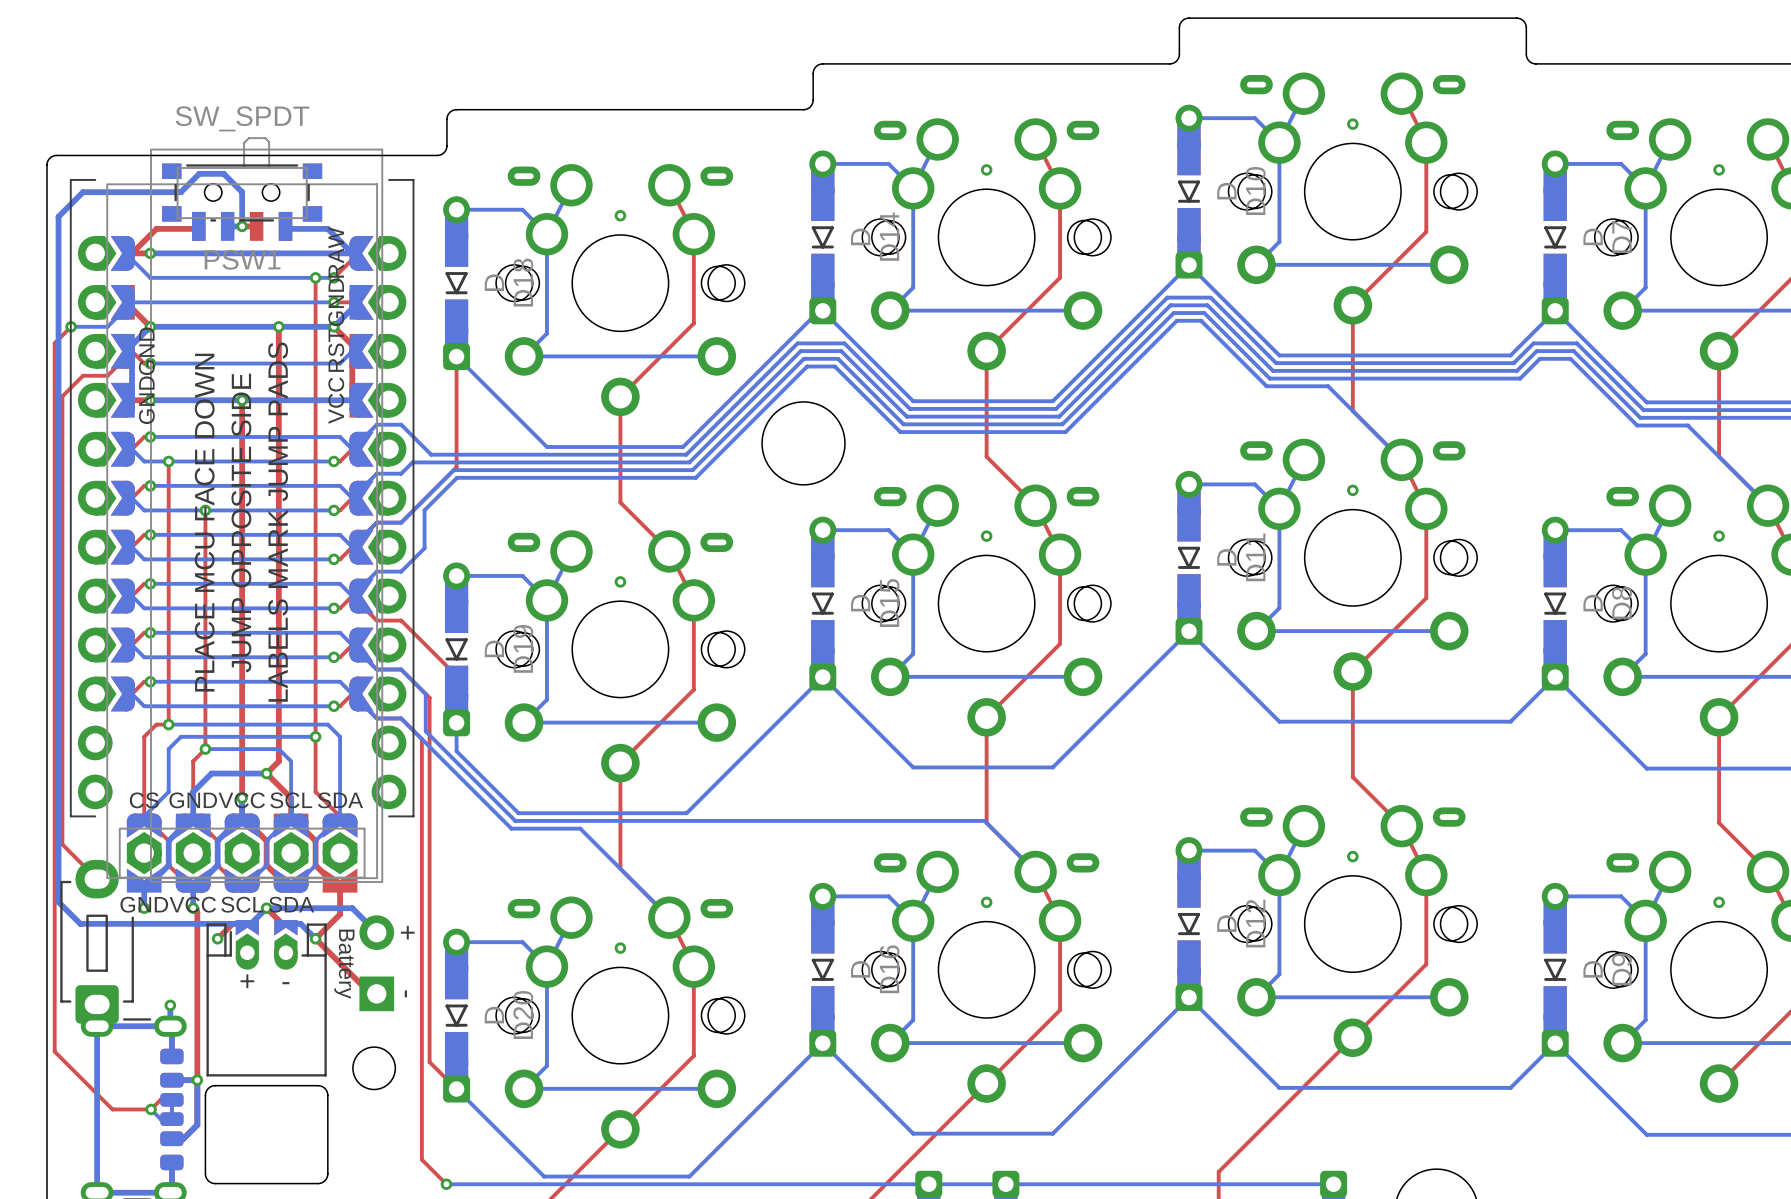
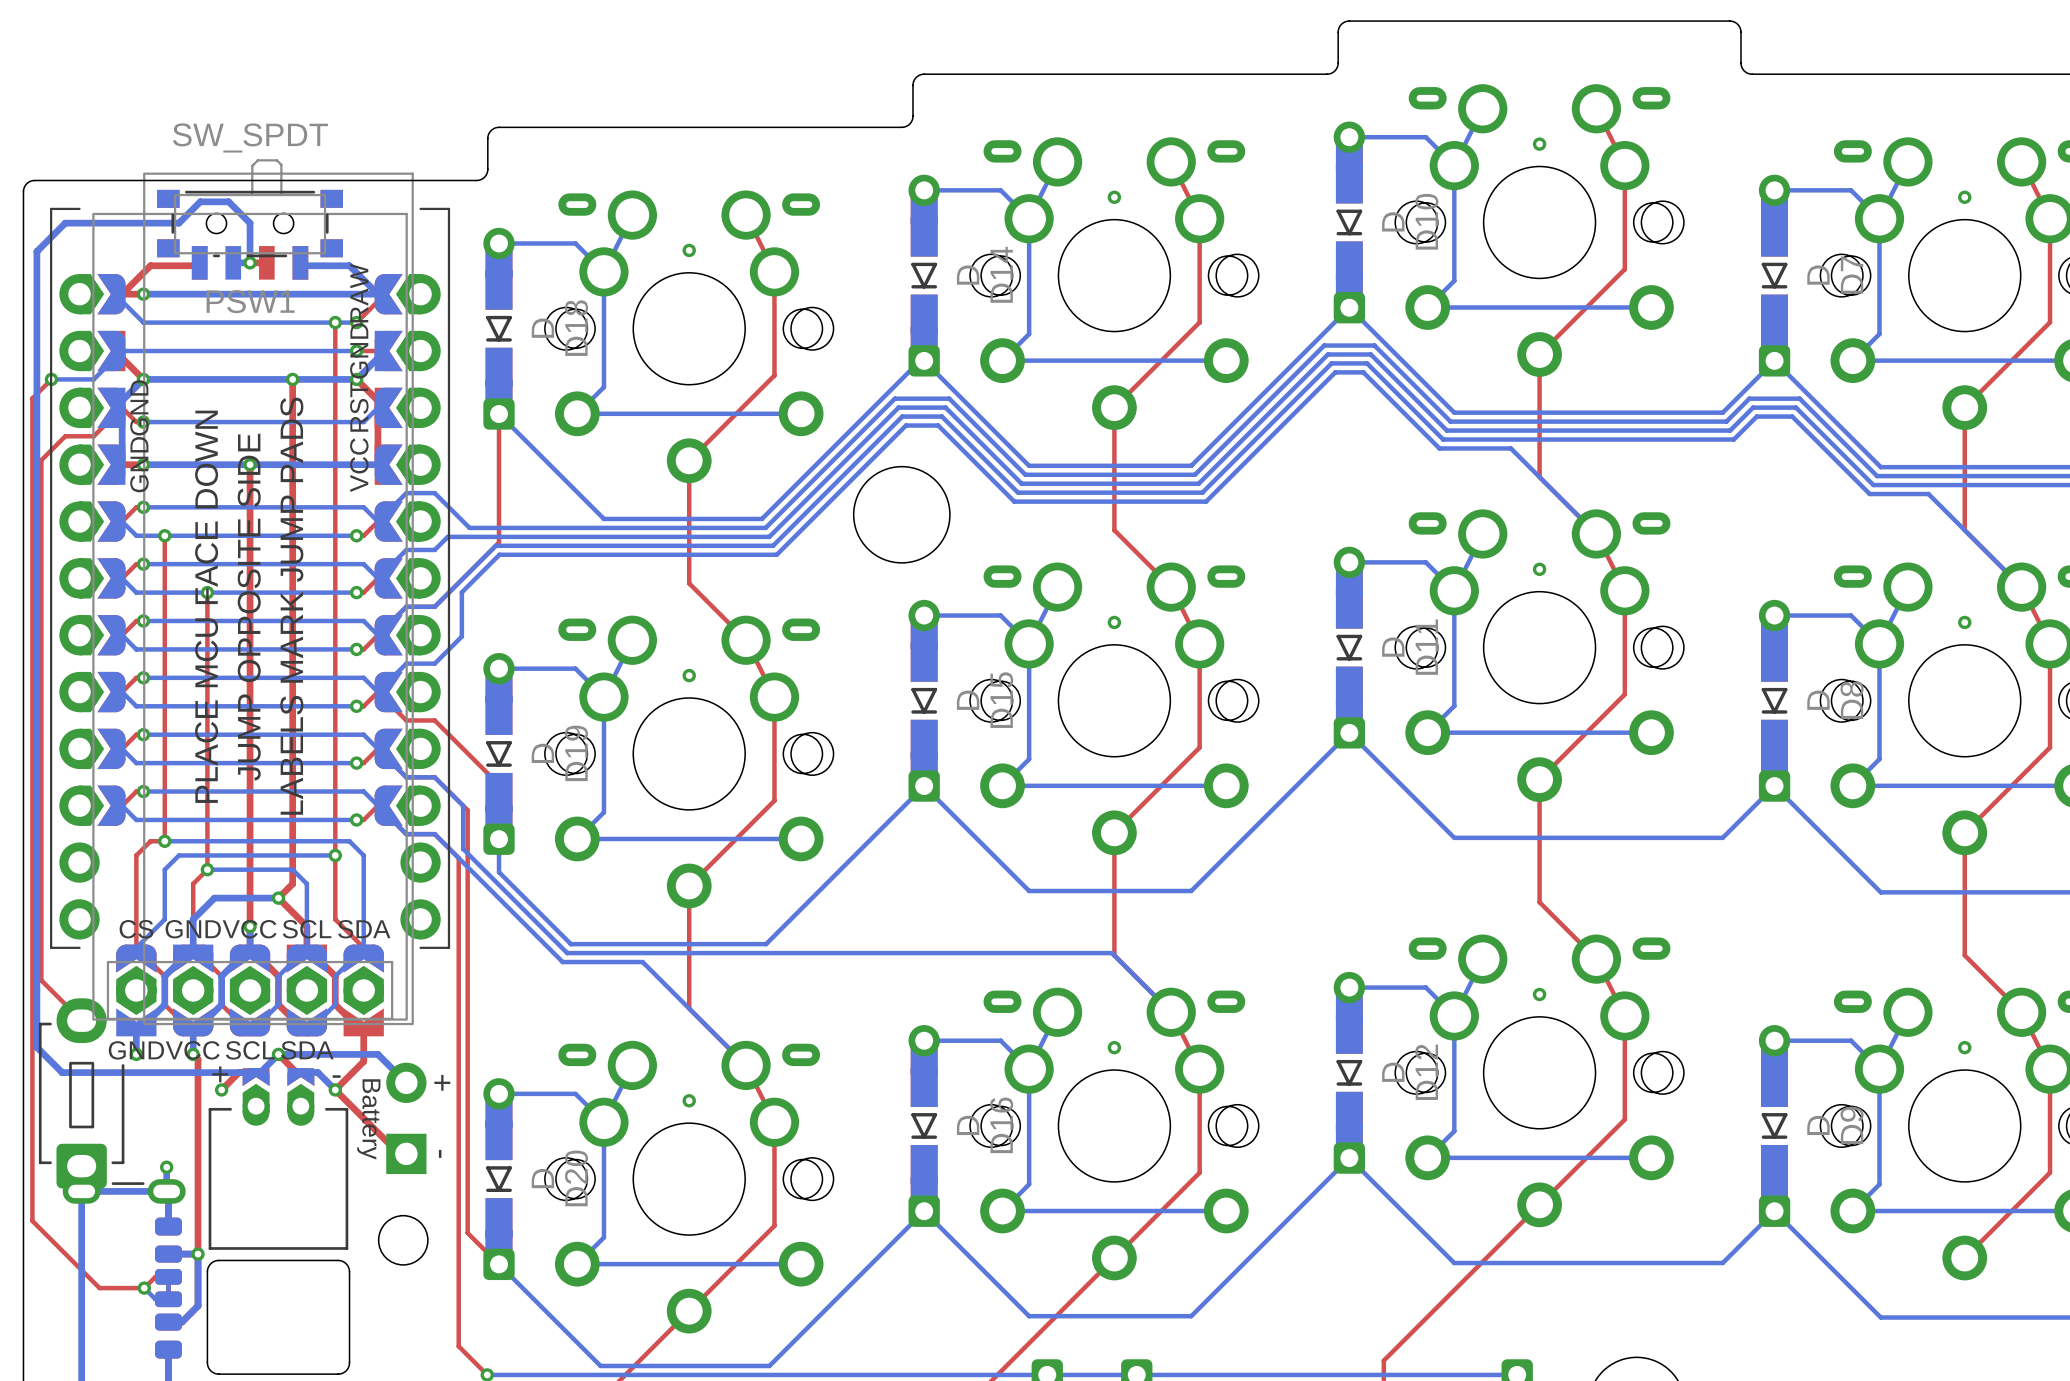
part footprint: [106, 148, 384, 893] -> [92, 172, 414, 1037]
part footprint: [69, 178, 415, 818] -> [49, 207, 451, 949]
part footprint: [206, 920, 327, 1077] -> [208, 1068, 349, 1250]

